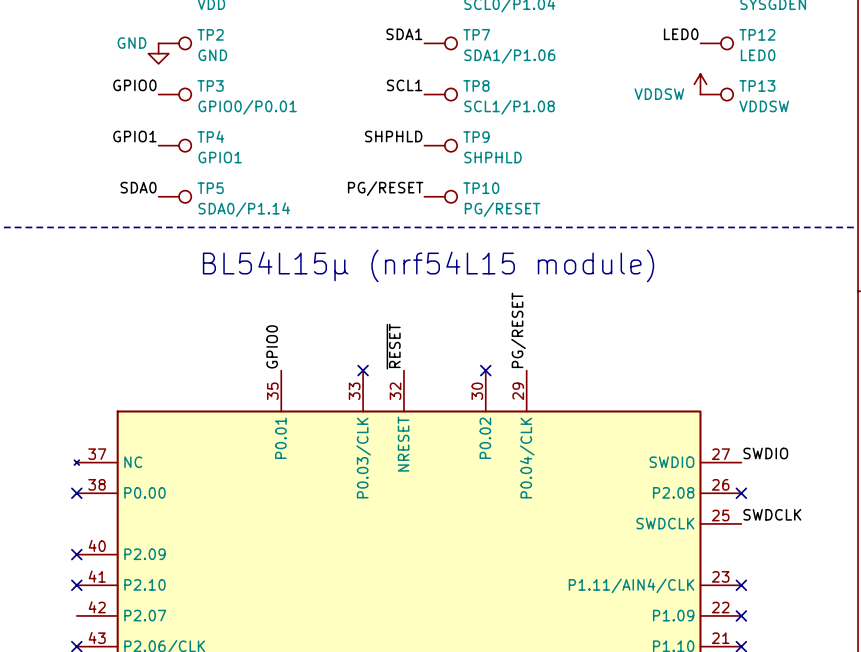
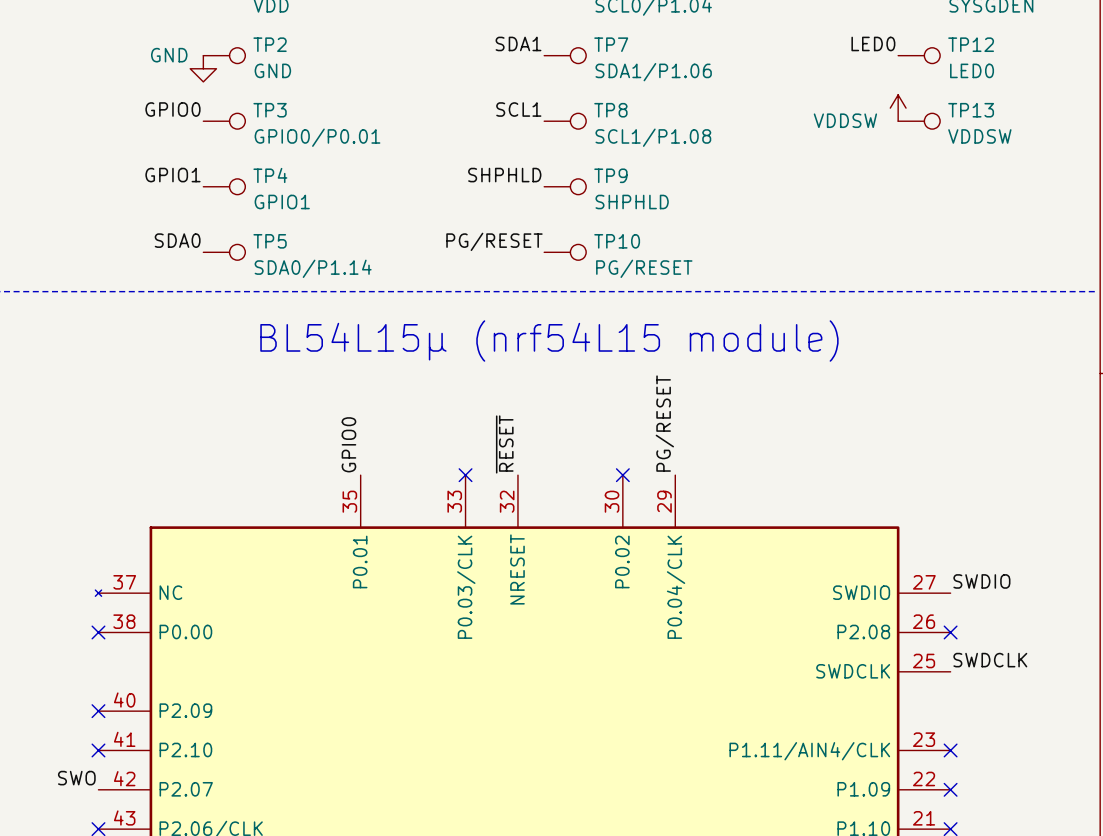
label: none -> SWO (76, 778)

